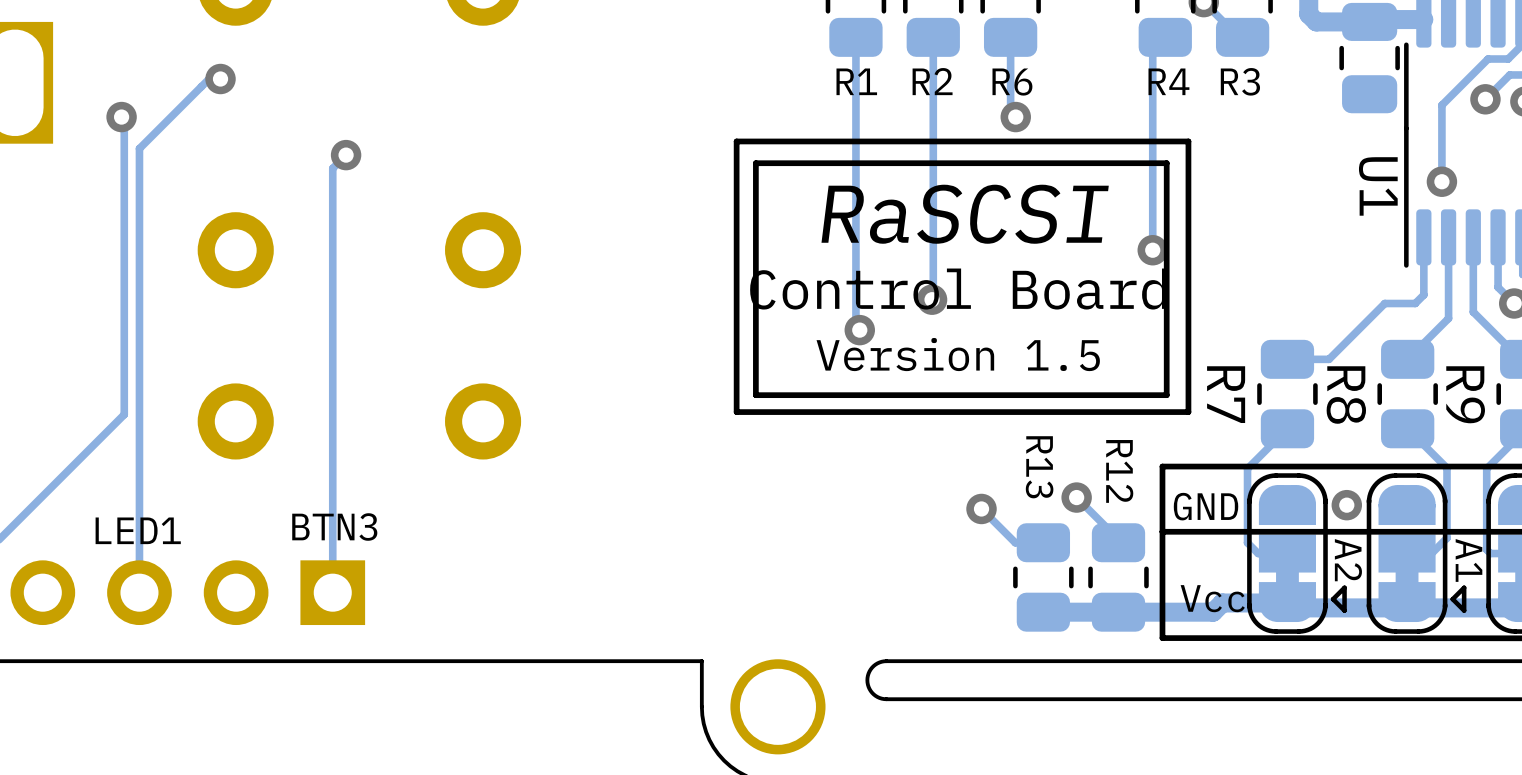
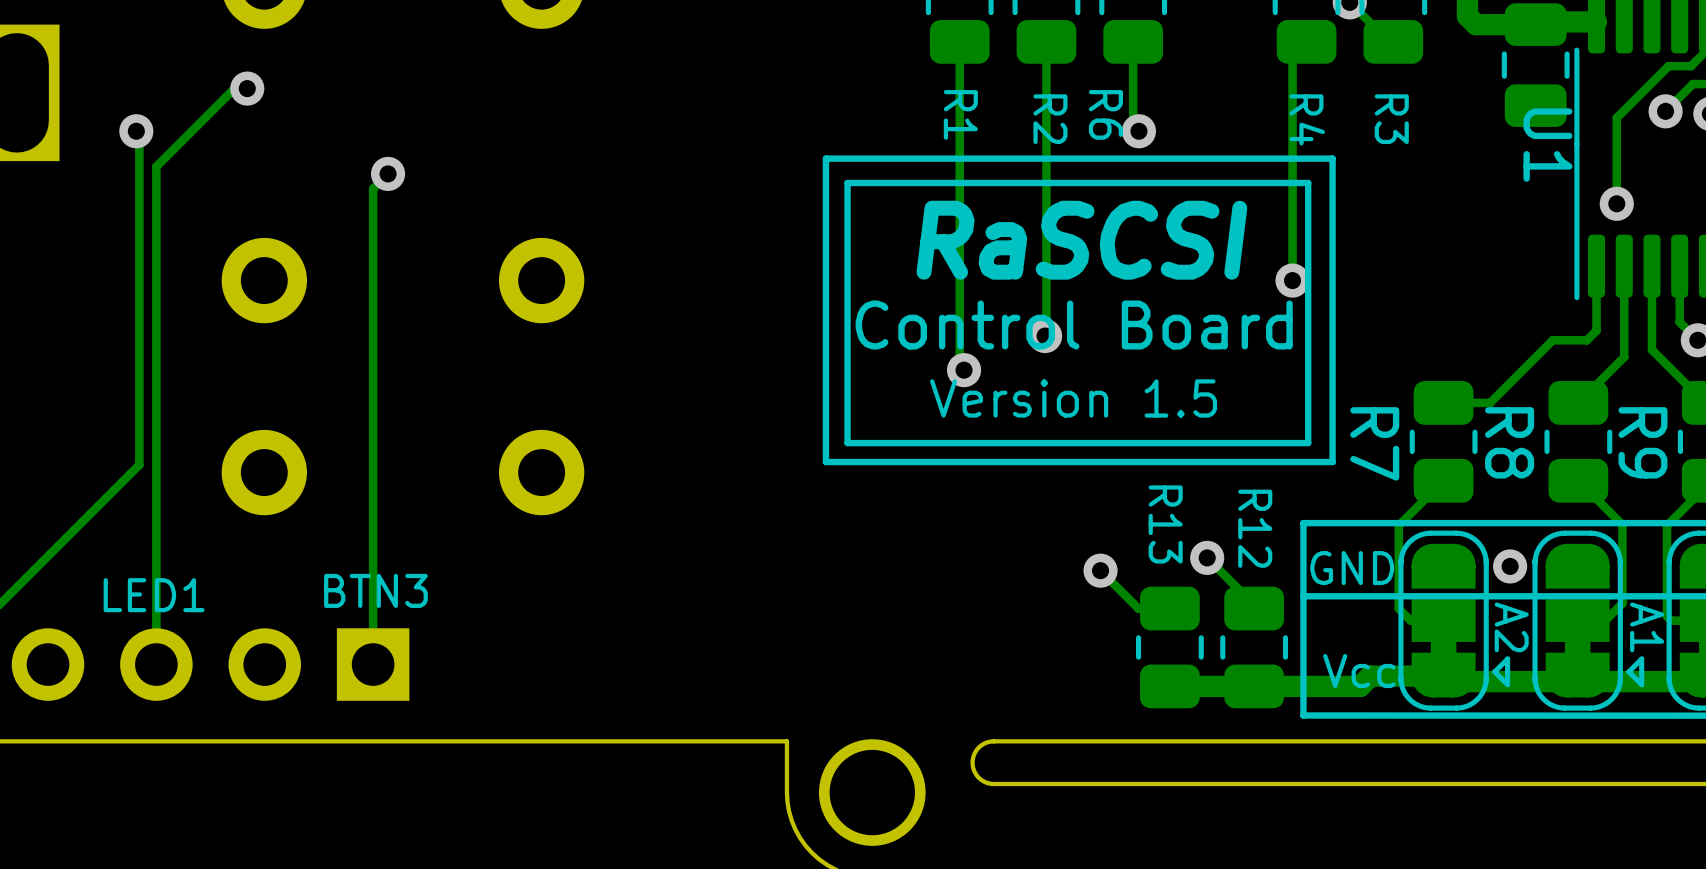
R1 name rotation: 0° (856, 81) -> 90° clockwise (960, 114)
R2 name rotation: 0° (932, 81) -> 90° clockwise (1050, 119)
R4 name rotation: 0° (1168, 81) -> 90° clockwise (1307, 119)
R3 name rotation: 0° (1240, 81) -> 90° clockwise (1391, 119)
R6 name rotation: 0° (1012, 82) -> 90° clockwise (1105, 114)
U1 name position: U1 (1378, 186) -> U1 (1547, 145)

